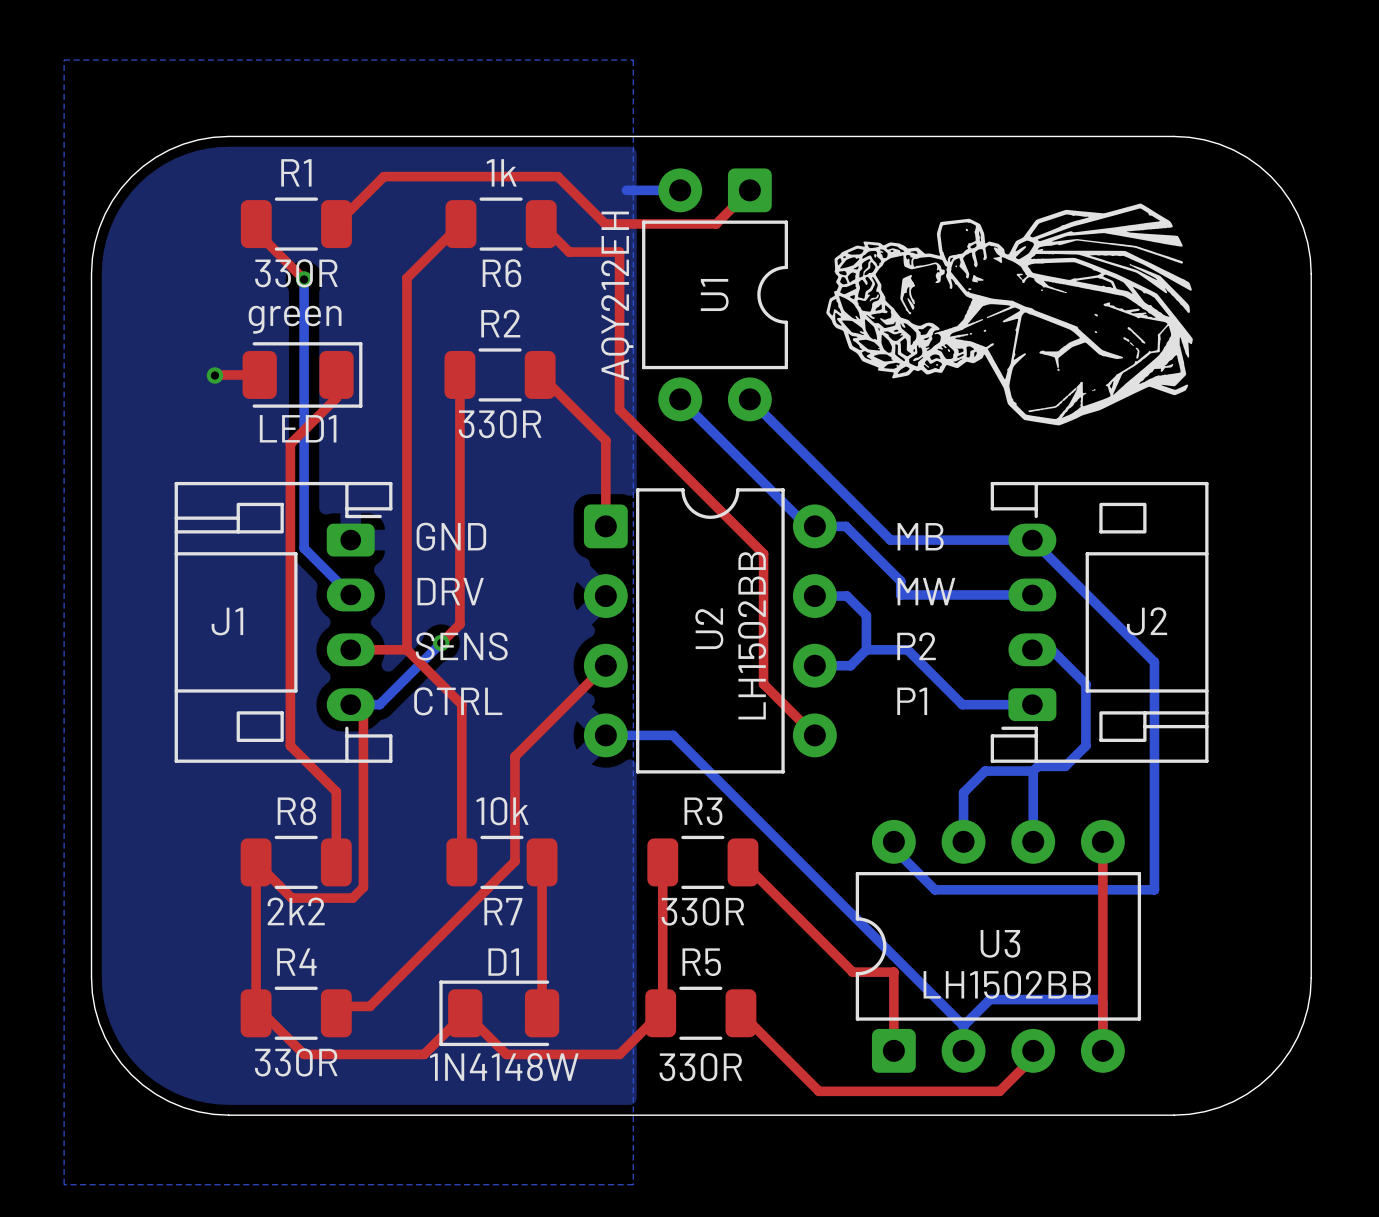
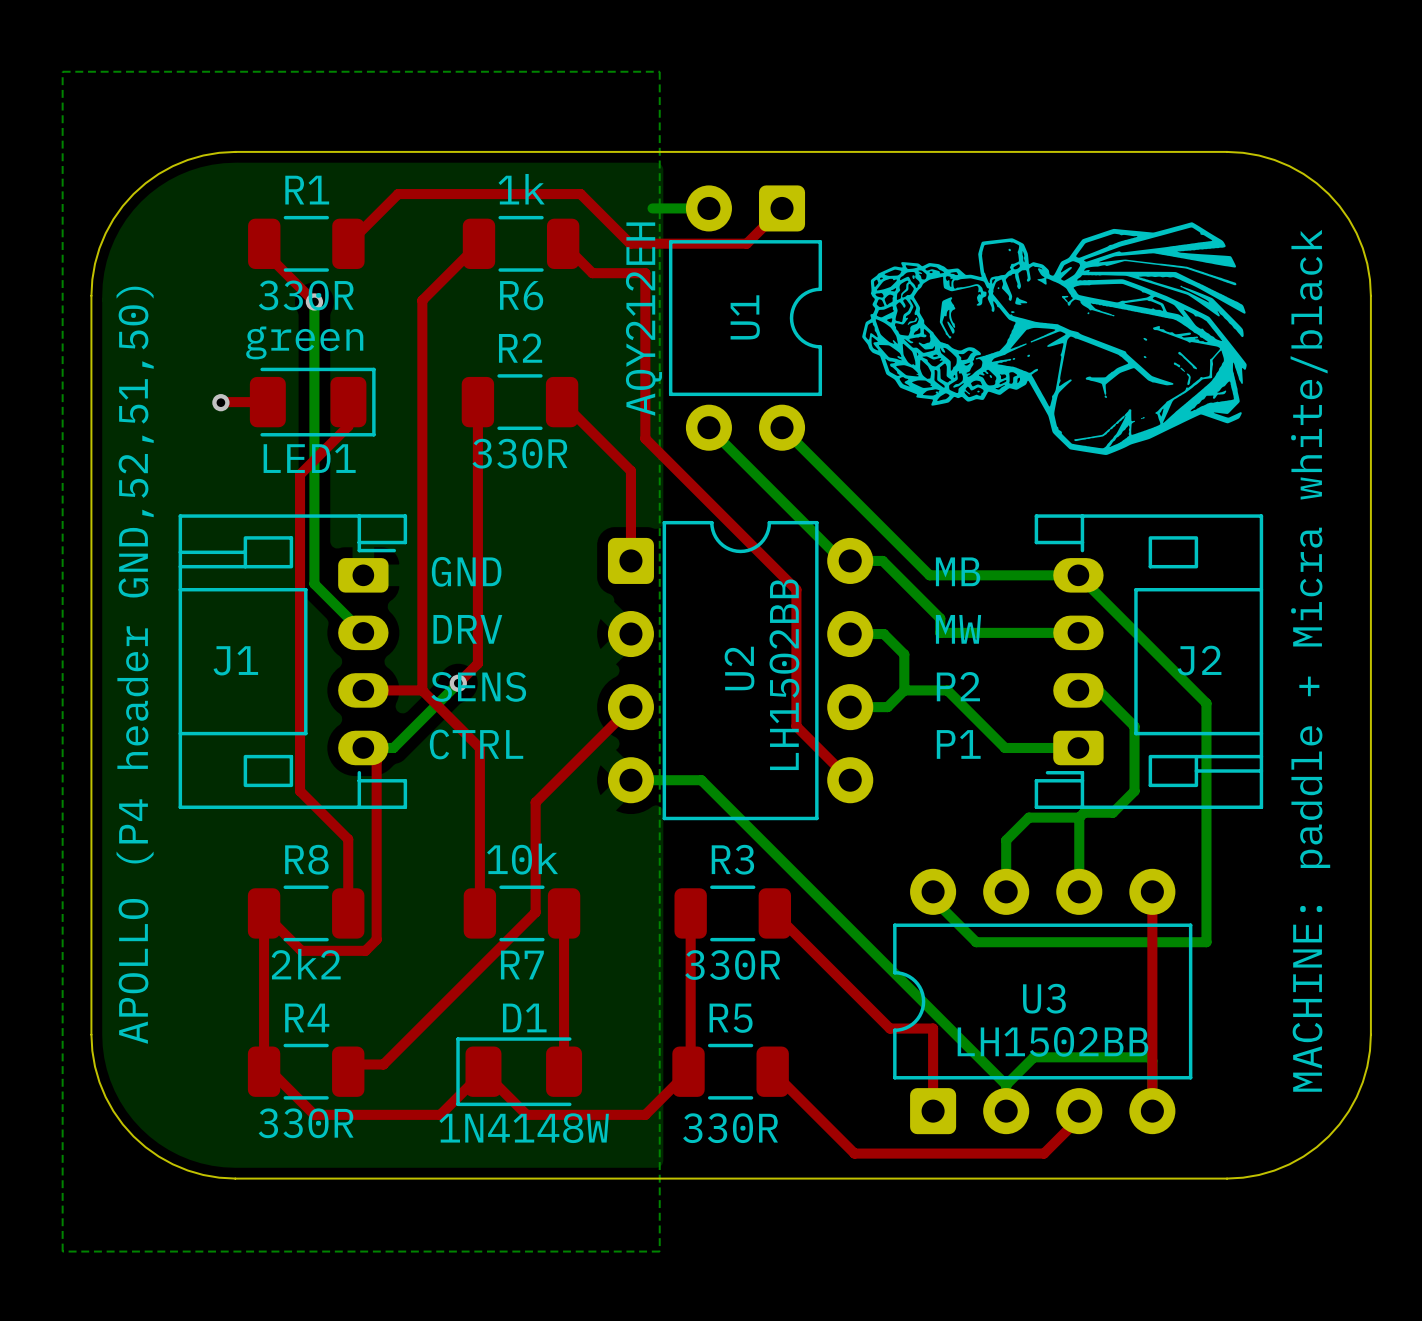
J1 value: none -> APOLLO (P4 header GND,52,51,50) (135, 665)
J2 value: none -> MACHINE: paddle + Micra white/black (1310, 660)

